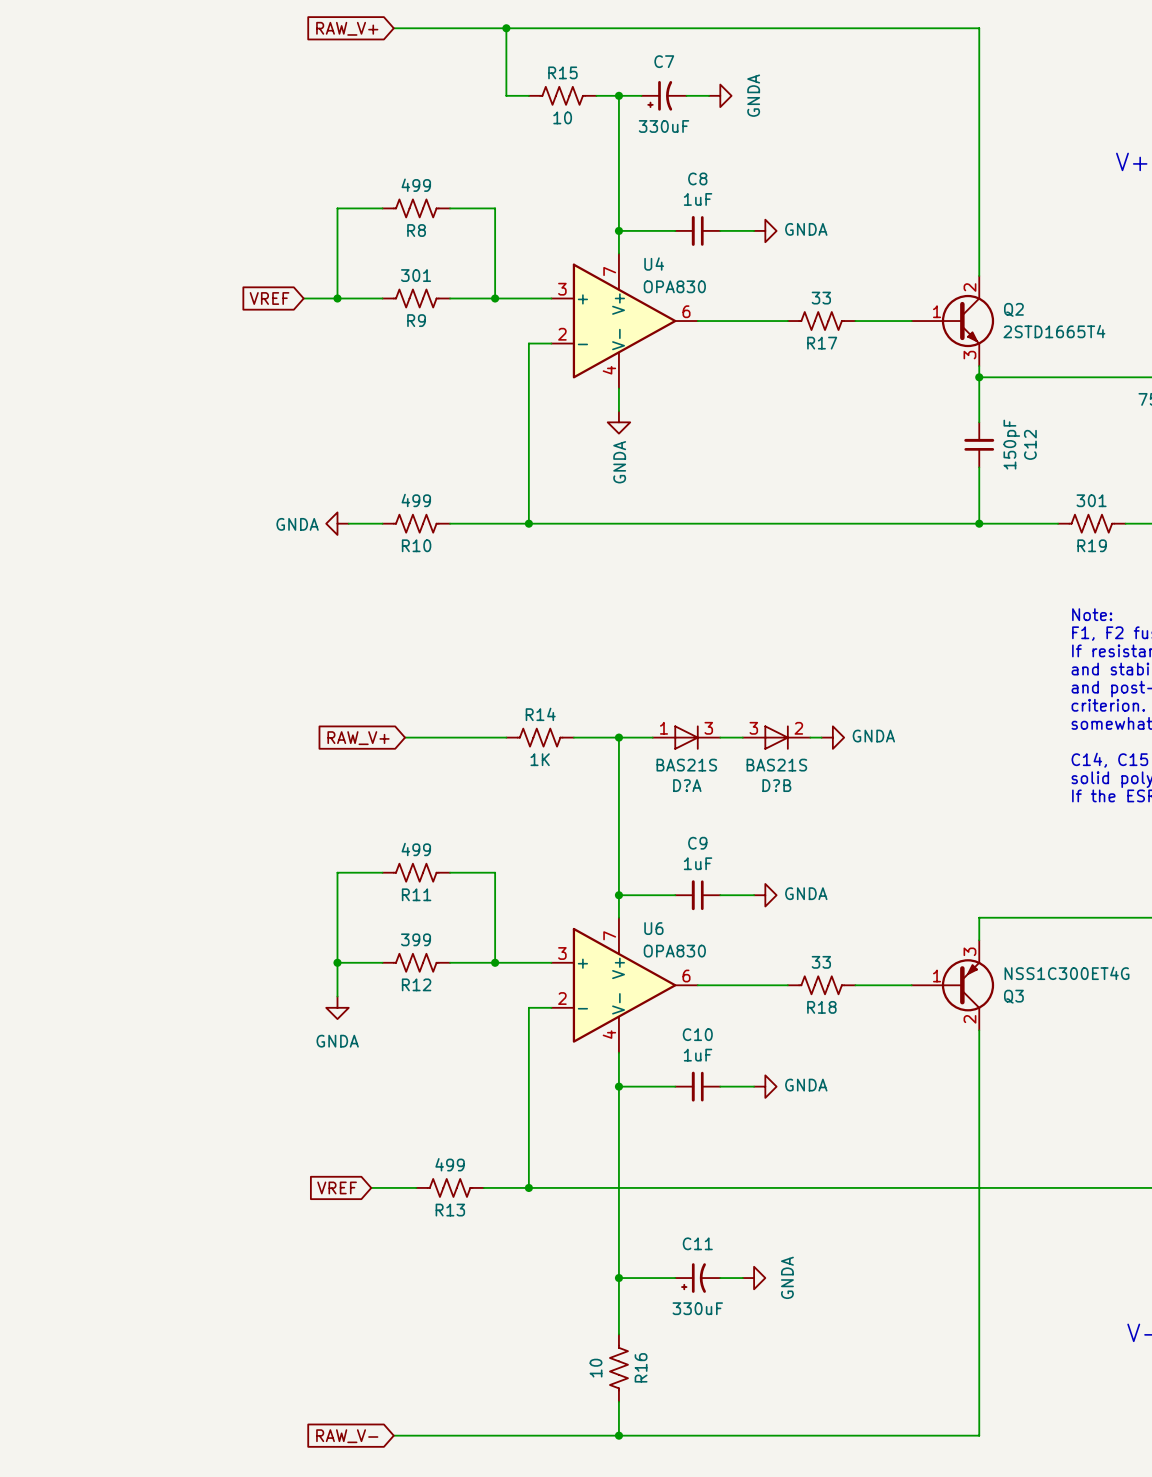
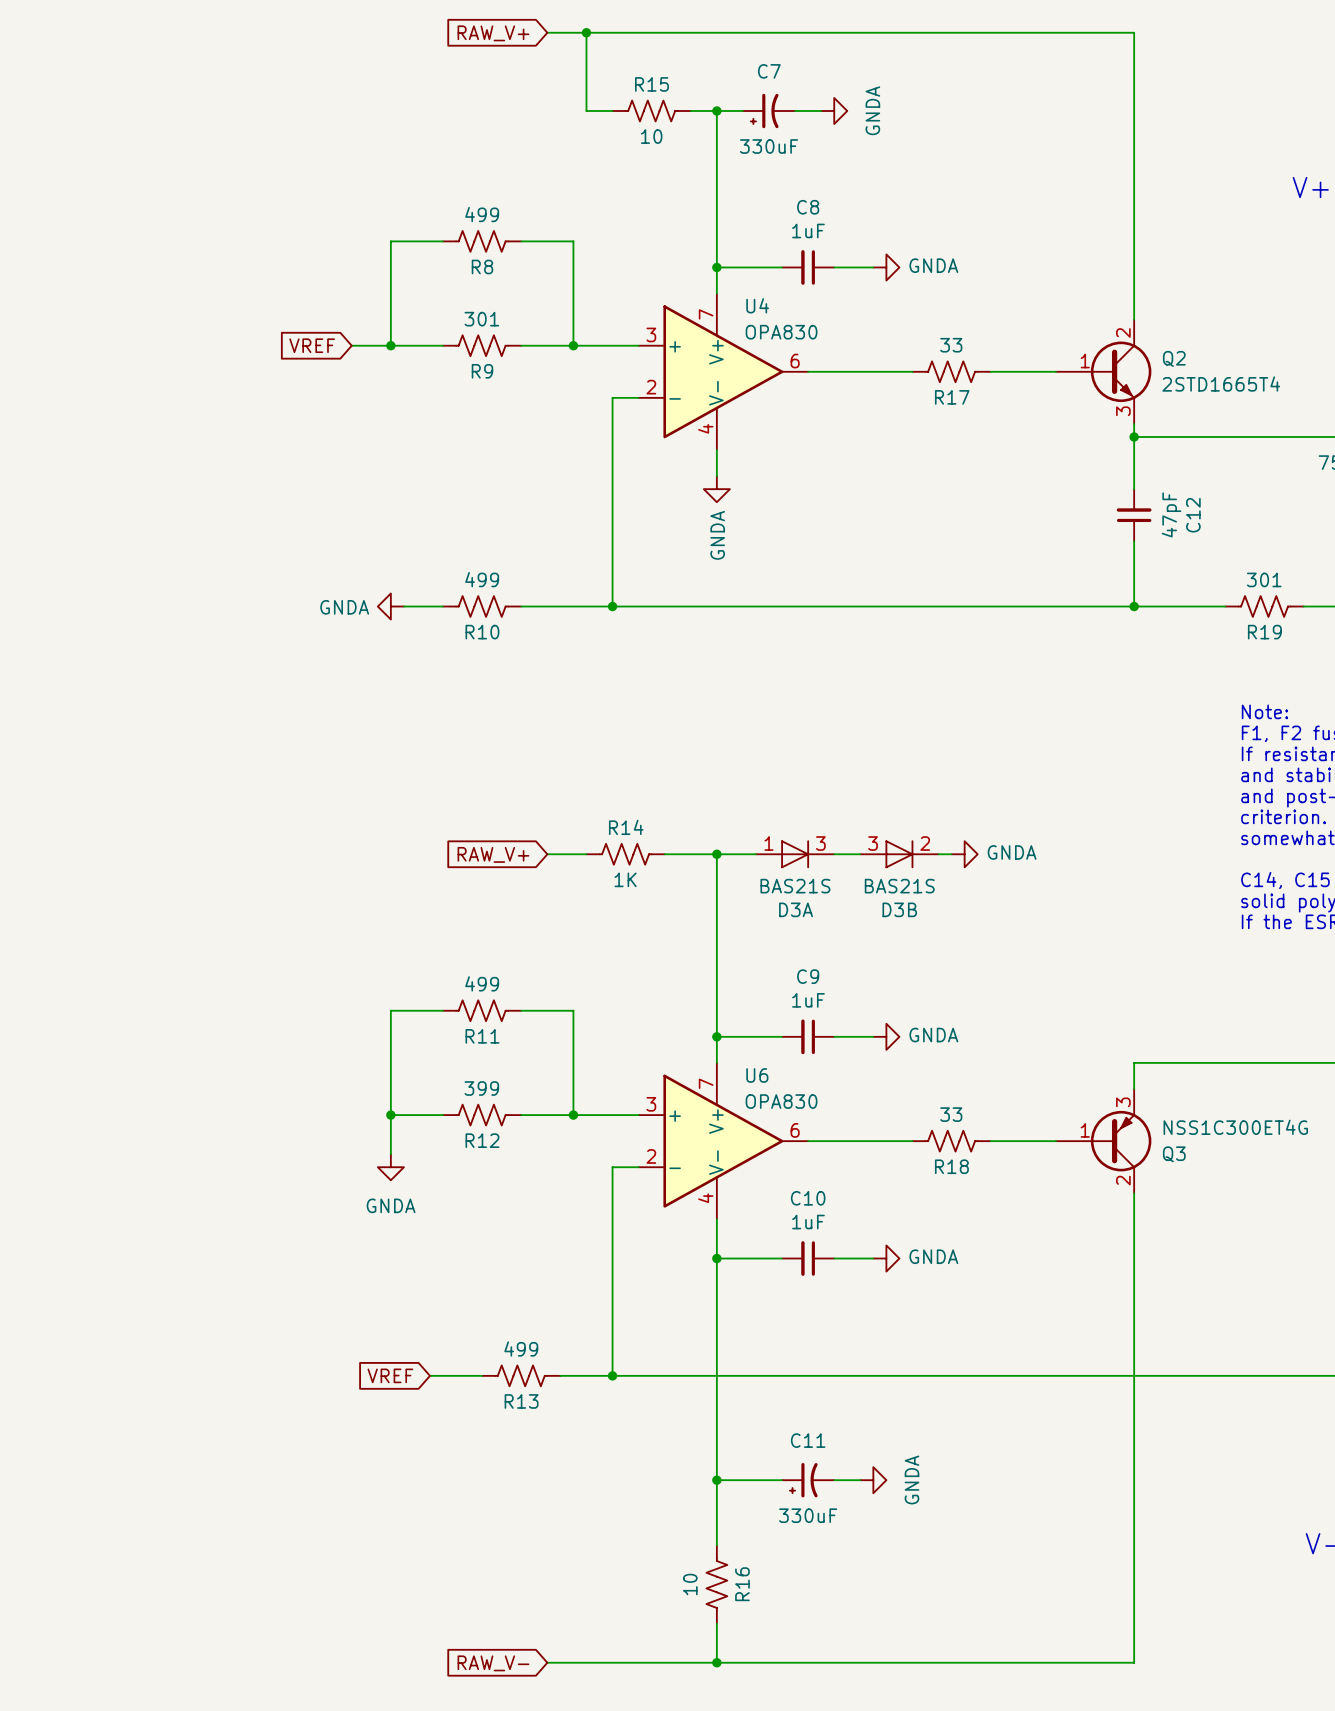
global label position: RAW_V+ (347, 28) -> RAW_V+ (493, 33)
wire: (393, 28) (472, 28) -> none
C12 value: 150pF (1011, 444) -> 47pF (1171, 514)
wire: (405, 737) (472, 737) -> none
global label position: RAW_V+ (358, 738) -> RAW_V+ (493, 854)
D?A name: D?A (687, 785) -> D3A (796, 909)
D?B name: D?B (776, 785) -> D3B (899, 909)
wire: (393, 1435) (472, 1435) -> none
global label position: RAW_V- (347, 1436) -> RAW_V- (493, 1663)

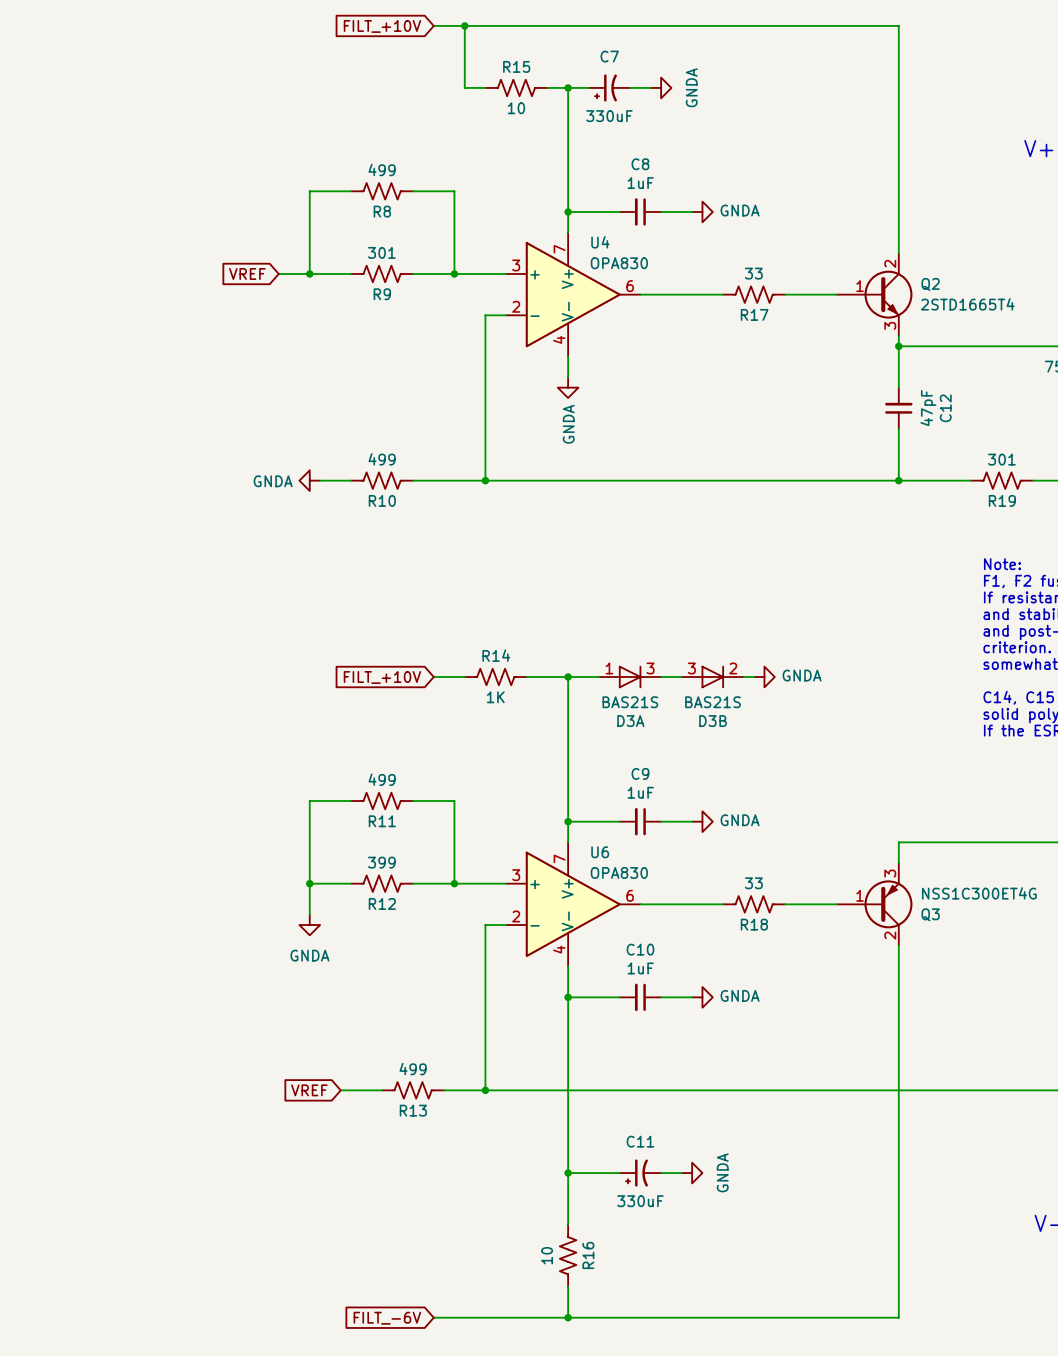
global label: RAW_V+ (493, 33) -> FILT_+10V (382, 26)
global label: RAW_V+ (493, 854) -> FILT_+10V (382, 677)
global label: RAW_V- (493, 1663) -> FILT_-6V (387, 1318)

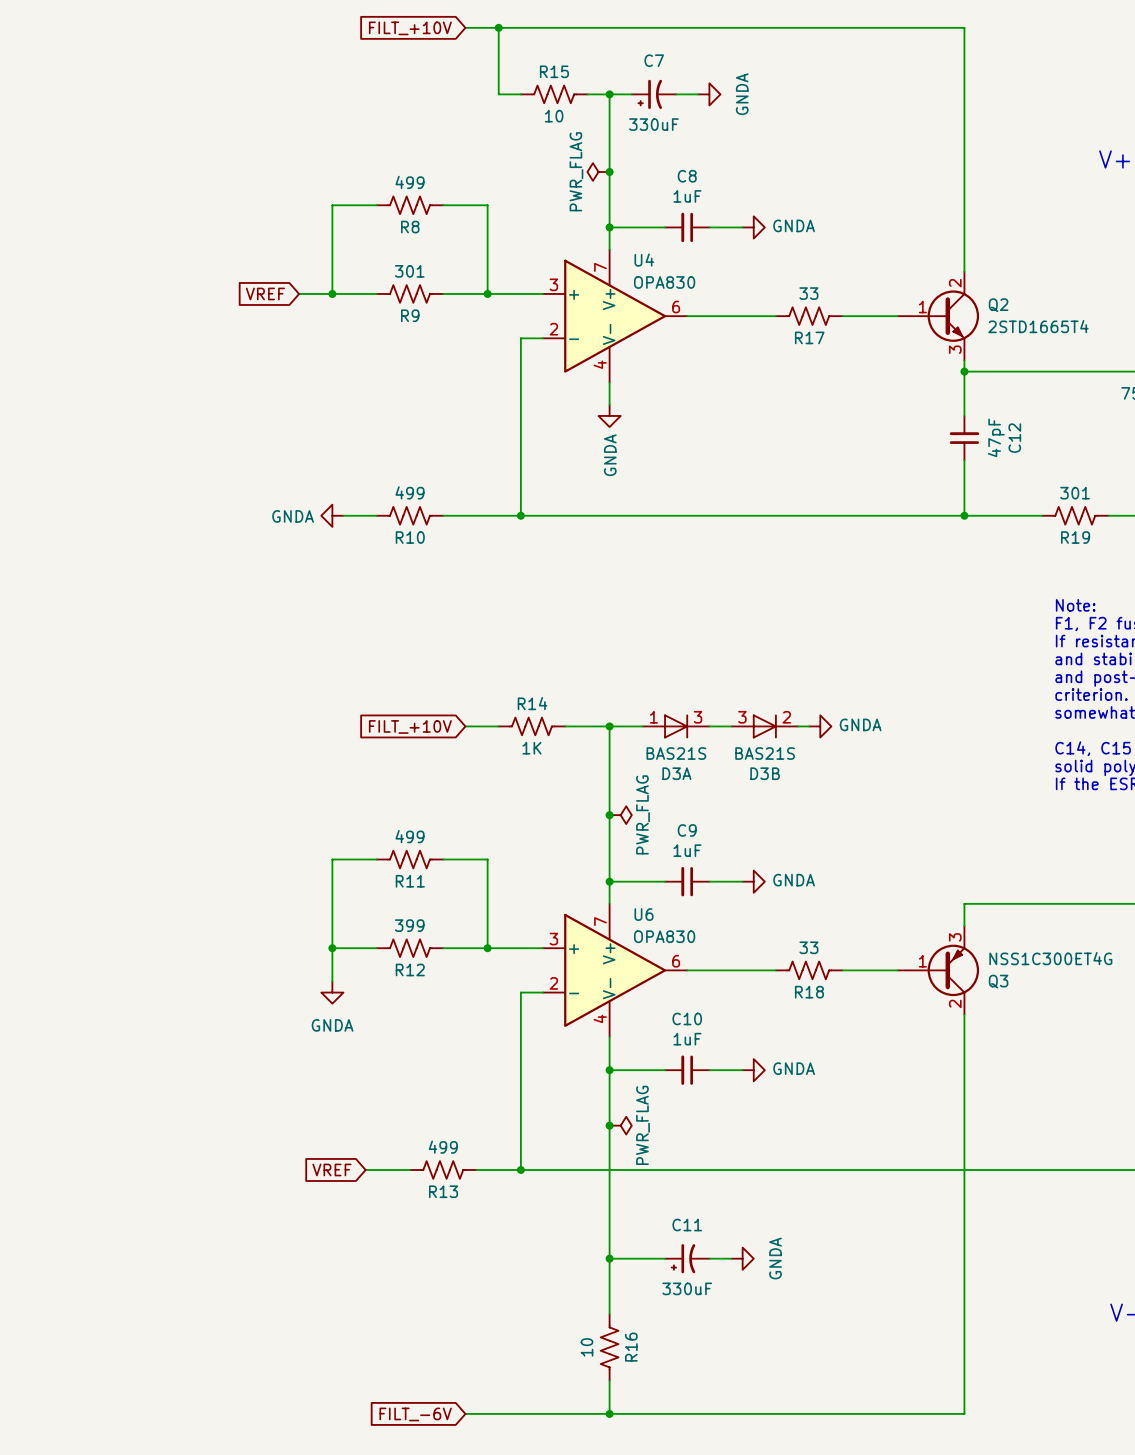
power symbol: none -> PWR_FLAG (598, 172)
junction: none -> (609, 172)
junction: none -> (609, 815)
power symbol: none -> PWR_FLAG (620, 815)
junction: none -> (609, 1125)
power symbol: none -> PWR_FLAG (620, 1125)

